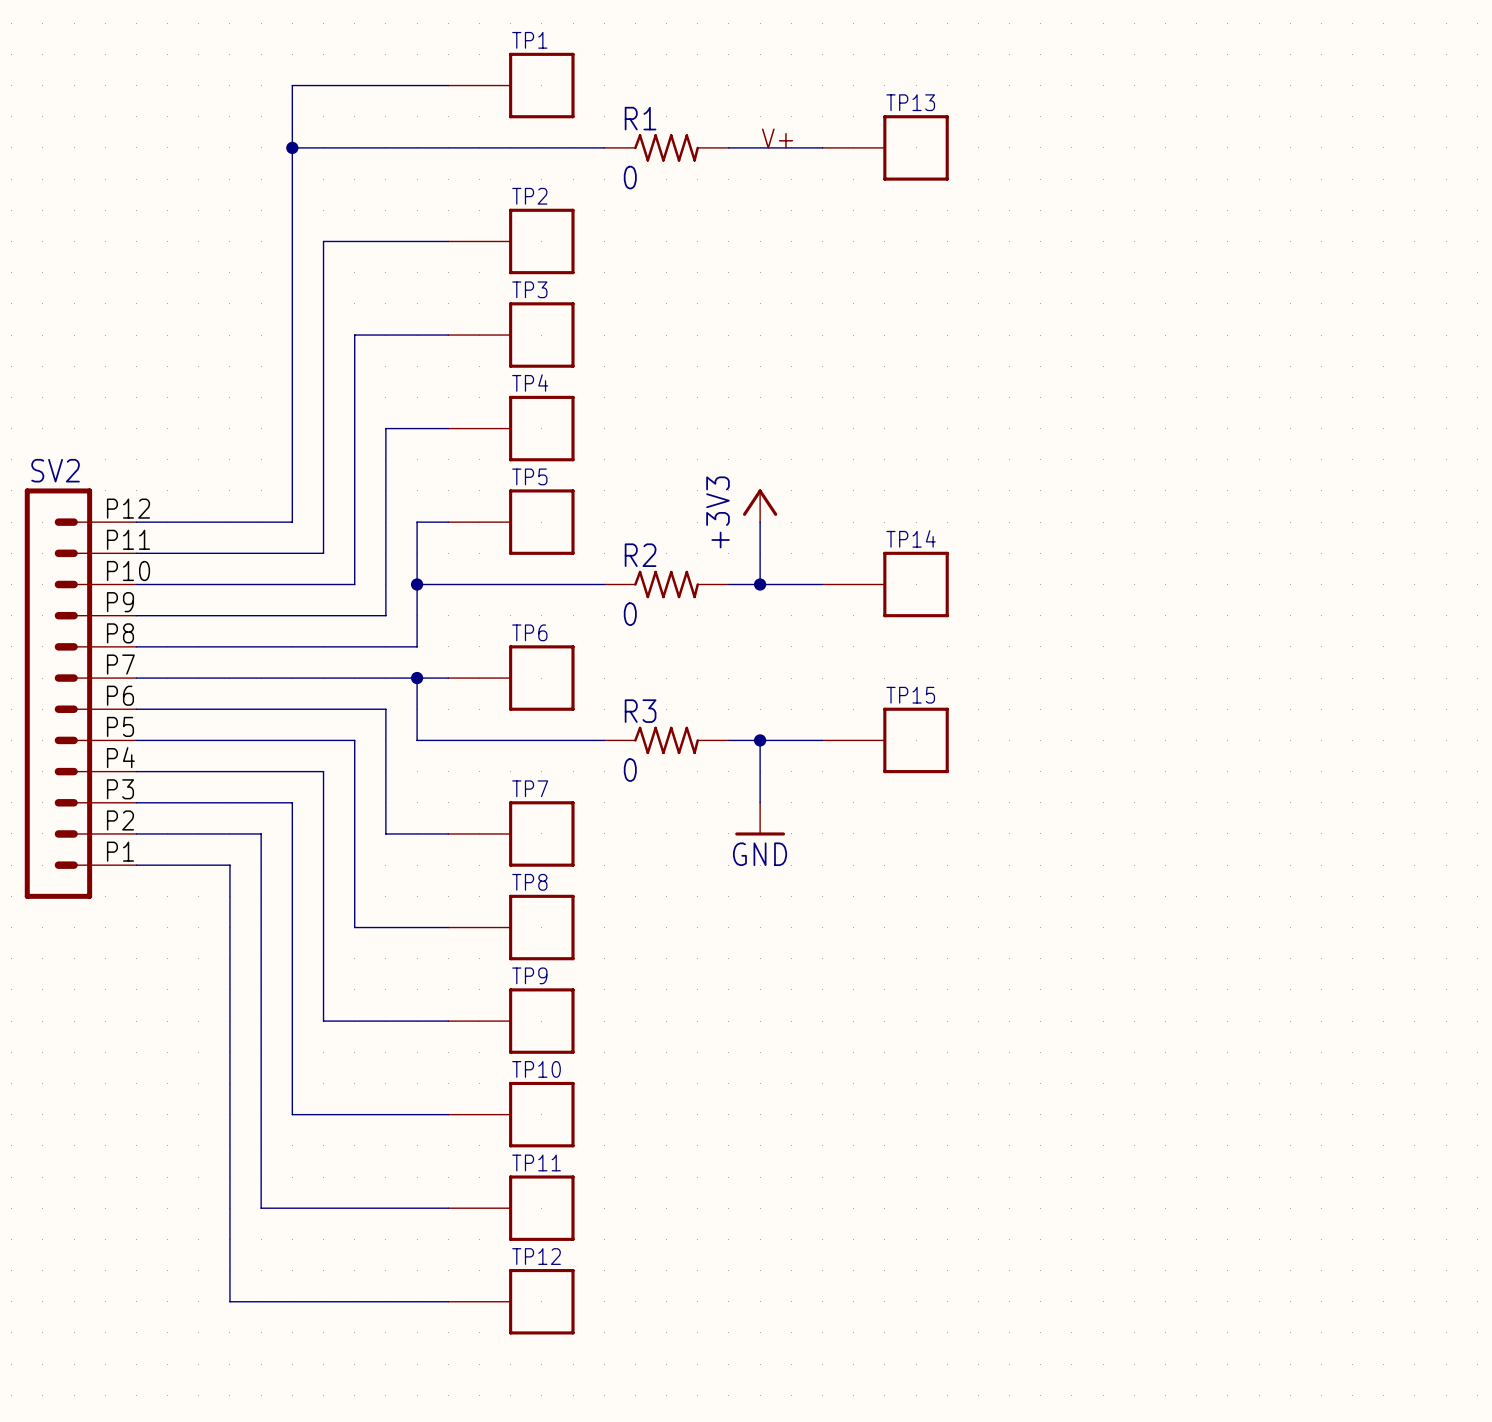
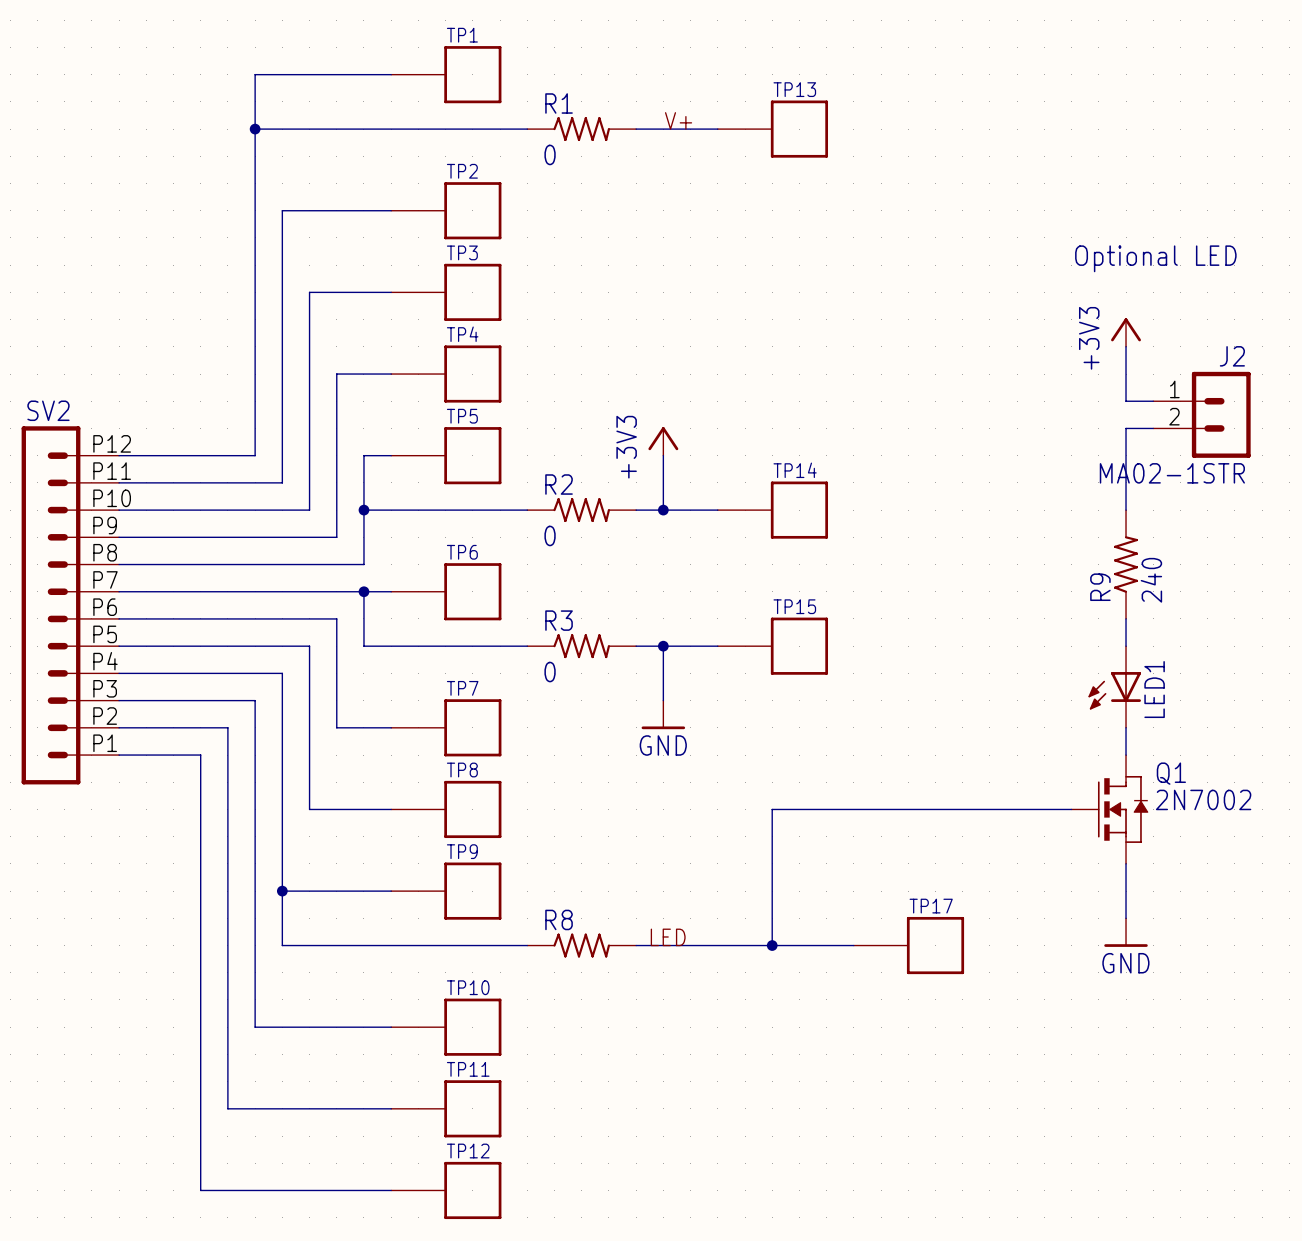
text: none -> Optional LED (1155, 258)
power symbol: none -> +3V3 (1126, 332)
wire: none -> (1126, 346) (1126, 401) (1153, 401)
J2: none -> MA02-1STR (1201, 414)
wire: none -> (1153, 428) (1126, 428) (1126, 510)
R9: none -> 240 (1126, 564)
wire: none -> (1126, 618) (1126, 646)
LED1: none -> (1114, 686)
wire: none -> (1126, 727) (1126, 755)
wire: none -> (1071, 809) (772, 809) (772, 945)
Q1: none -> 2N7002 (1109, 809)
wire: none -> (1126, 863) (1126, 918)
wire: none -> (282, 891) (282, 945) (527, 945)
junction: none -> (282, 891)
power symbol: none -> GND (1126, 932)
label: none -> LED (668, 937)
R8: none -> (581, 945)
wire: none -> (636, 945) (853, 945)
junction: none -> (772, 945)
TP17: none -> (908, 945)
wire: (292, 1114) (448, 1114) -> (255, 972) (255, 1027) (391, 1027)
TP10 position: (511, 1114) -> (446, 1027)
wire: (261, 1208) (448, 1208) -> (227, 1054) (227, 1108) (391, 1108)
TP11 position: (511, 1208) -> (446, 1108)
wire: (229, 1301) (448, 1301) -> (200, 1136) (200, 1190) (391, 1190)
TP12 position: (511, 1301) -> (446, 1190)

